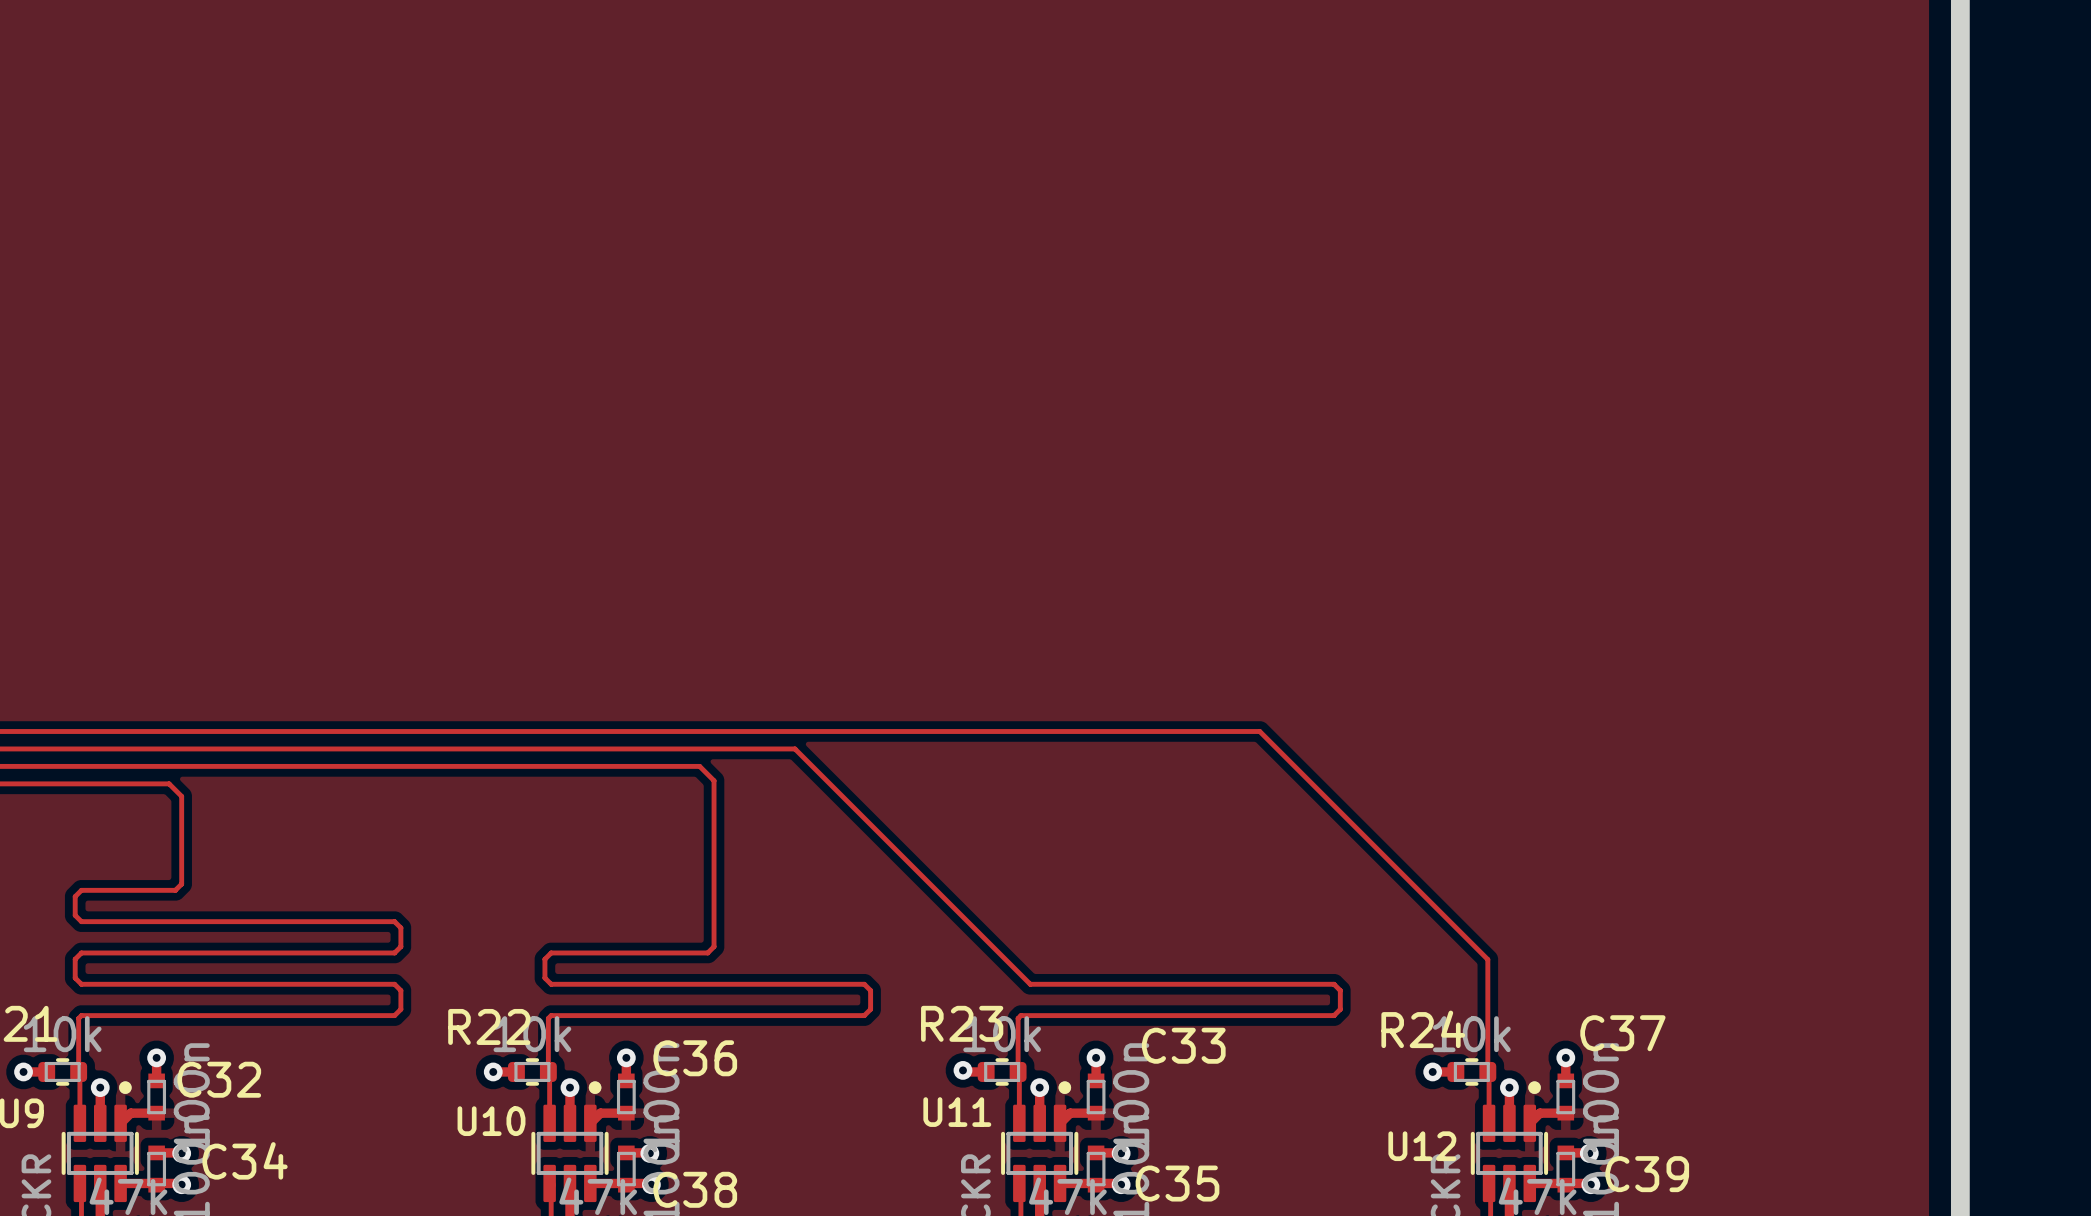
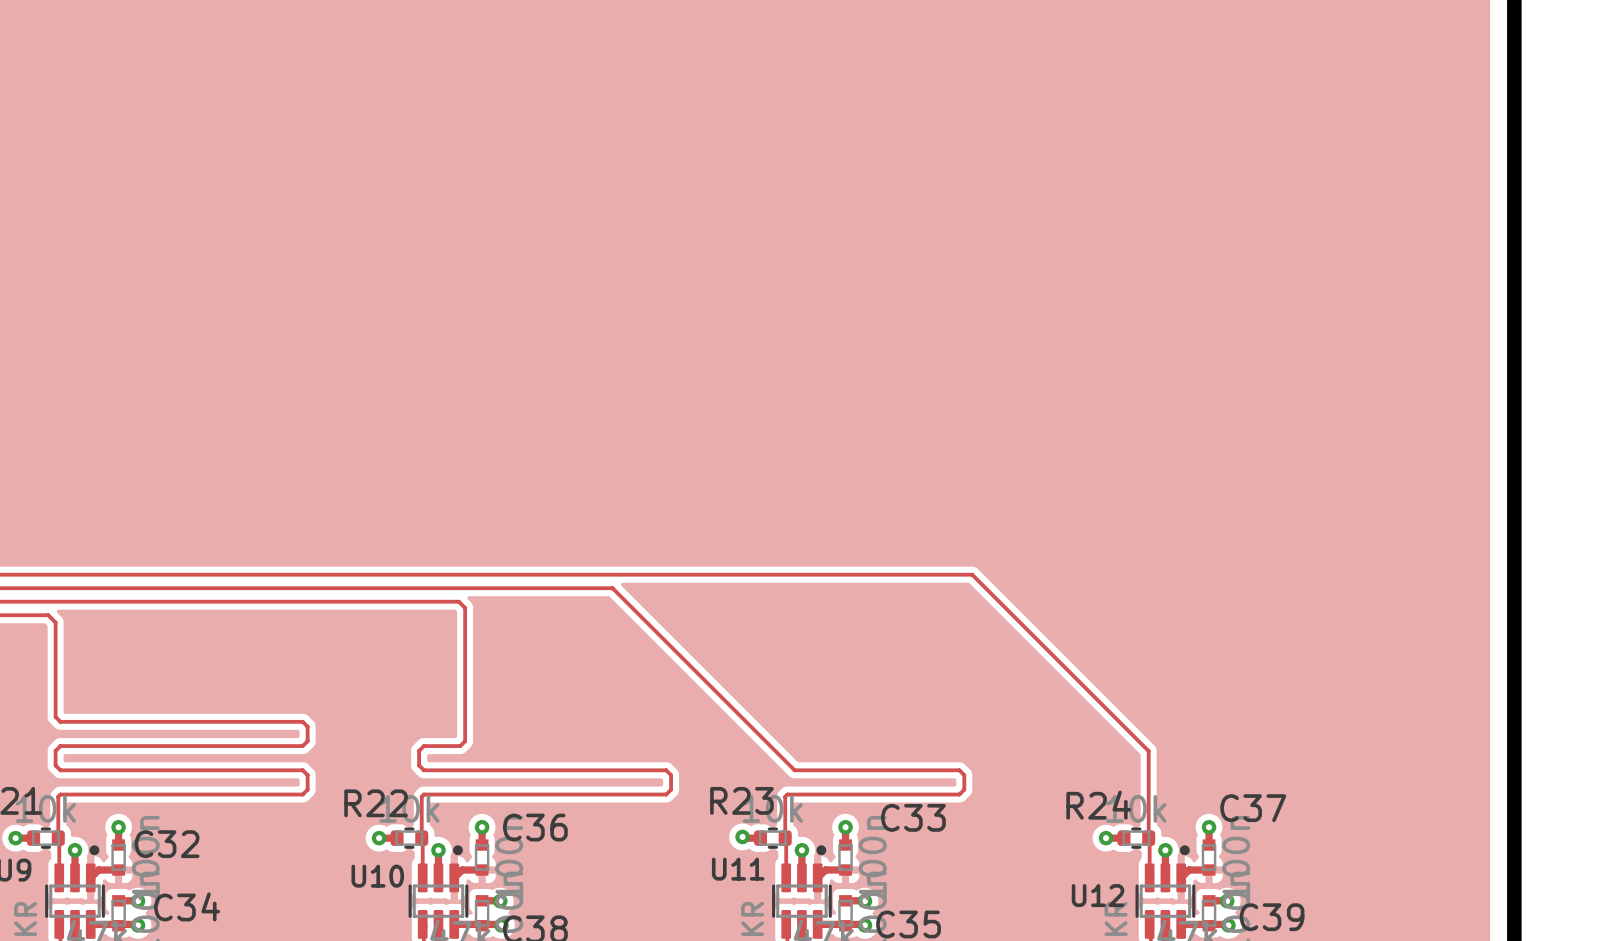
top track: (596, 766) (699, 766) (714, 780) (714, 946) (707, 952) (598, 952) -> (458, 601) (465, 607) (465, 741) (460, 746)
top track: (65, 783) (169, 783) (181, 796) (181, 884) (175, 890) (81, 890) (75, 896) -> (48, 615) (55, 622) (55, 702)
top track: (1243, 984) (1334, 984) (1340, 990) (1340, 1009) (1334, 1015) (1243, 1015) -> (959, 770) (964, 775) (964, 789) (959, 794)

